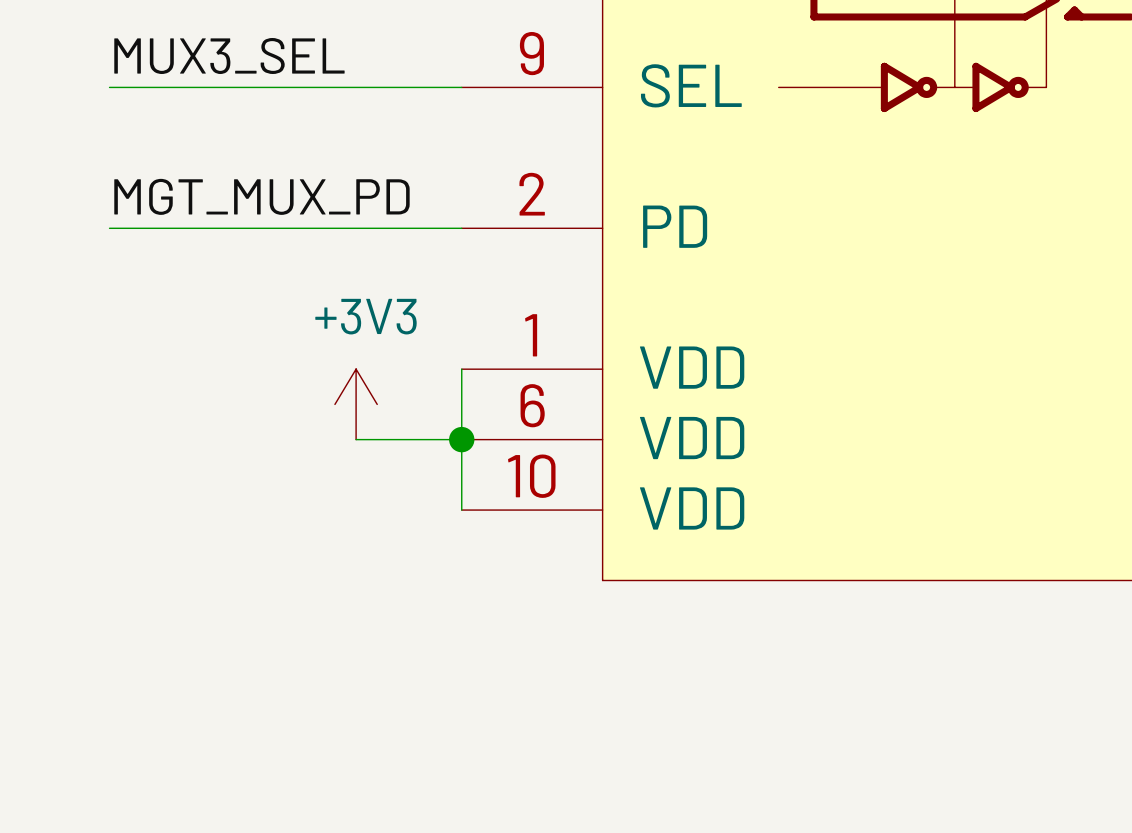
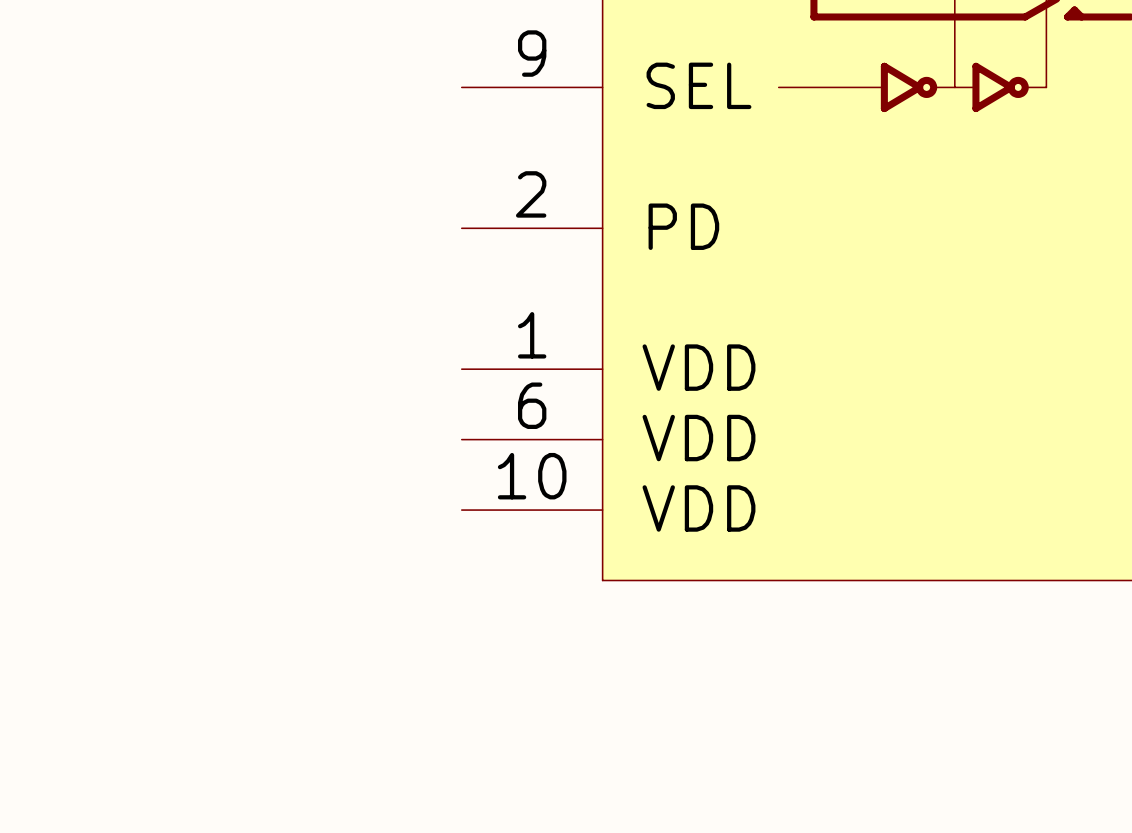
label: MUX3_SEL (229, 55) -> none
wire: (109, 87) (461, 87) -> none
label: MGT_MUX_PD (261, 196) -> none
wire: (109, 228) (461, 228) -> none
wire: (461, 369) (461, 510) -> none
power symbol: +3V3 (356, 404) -> none
wire: (356, 439) (461, 439) -> none
junction: (461, 439) -> none

